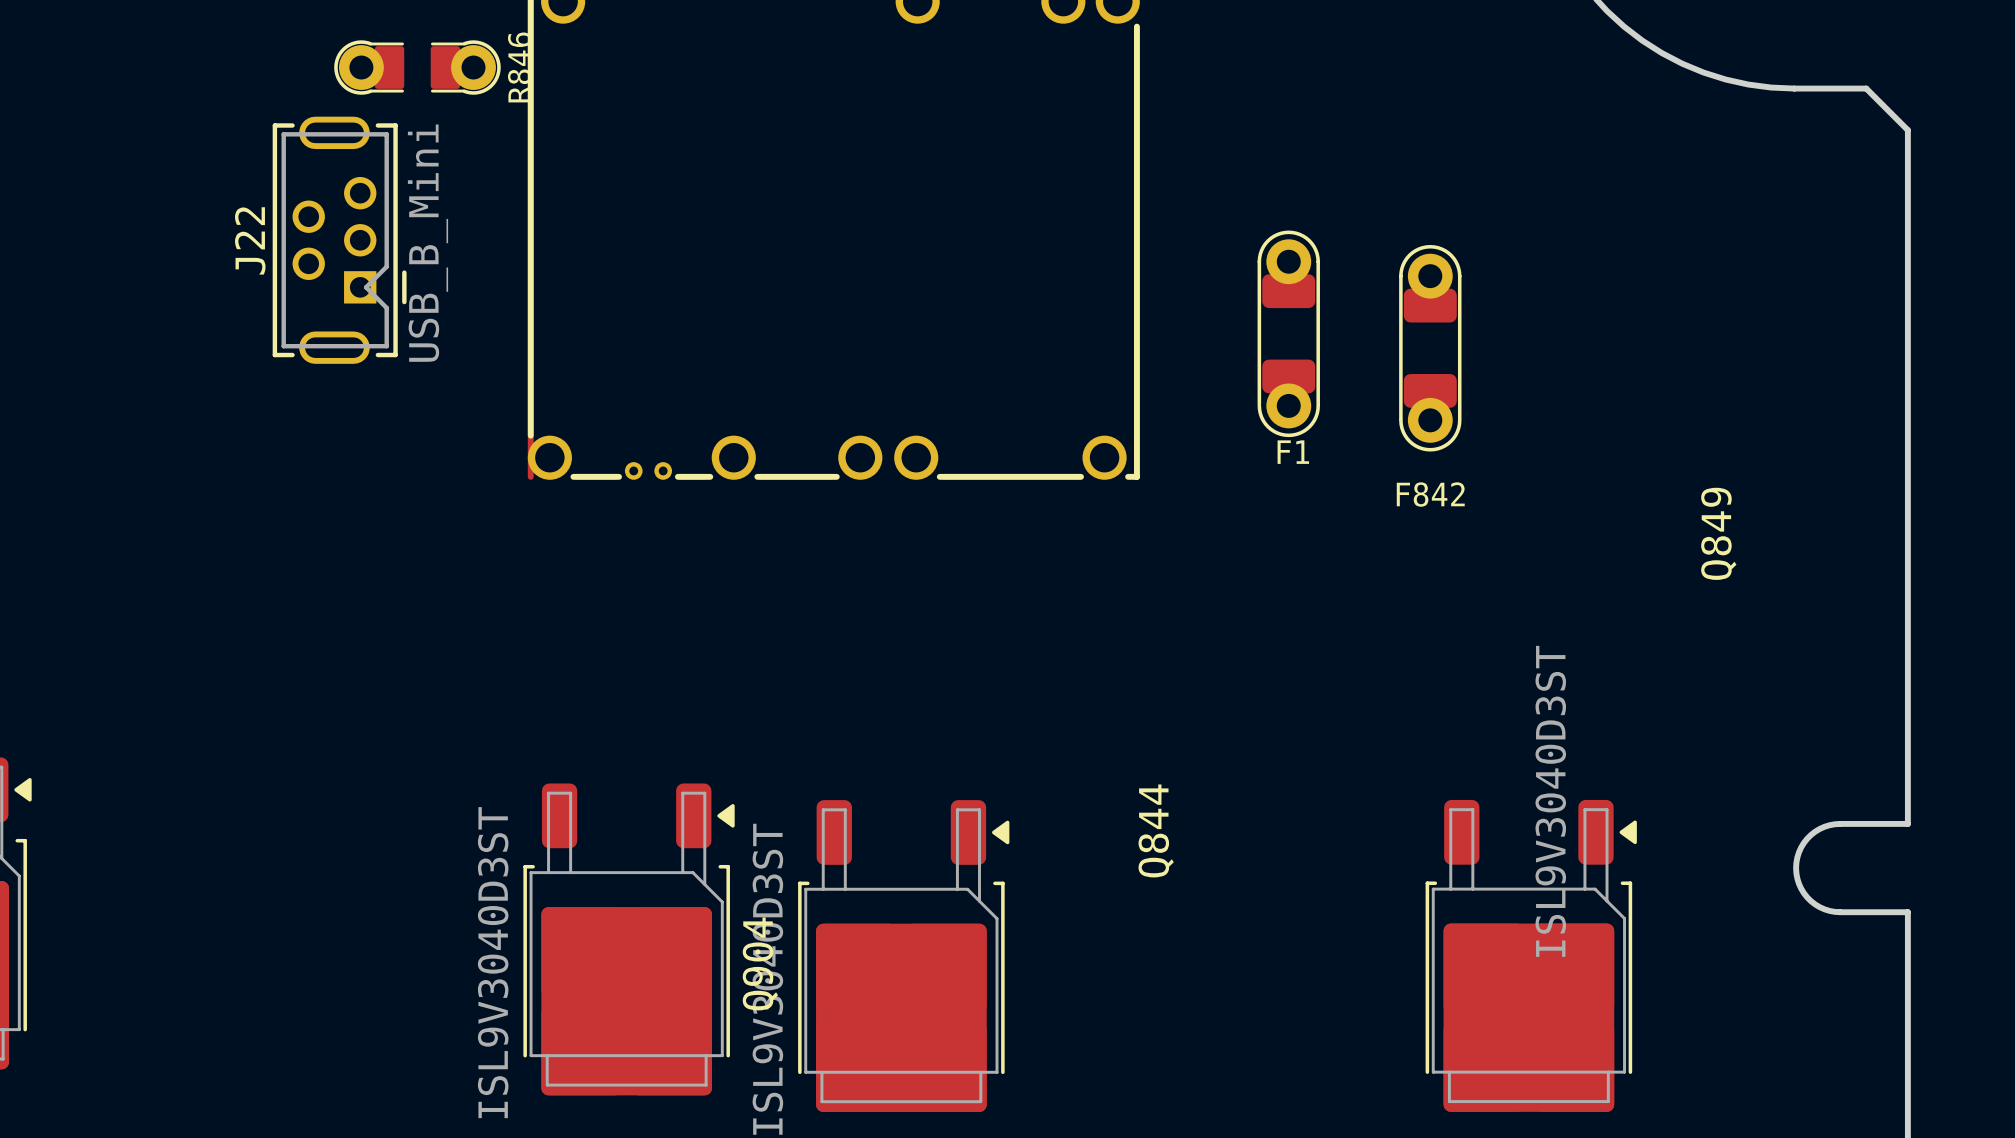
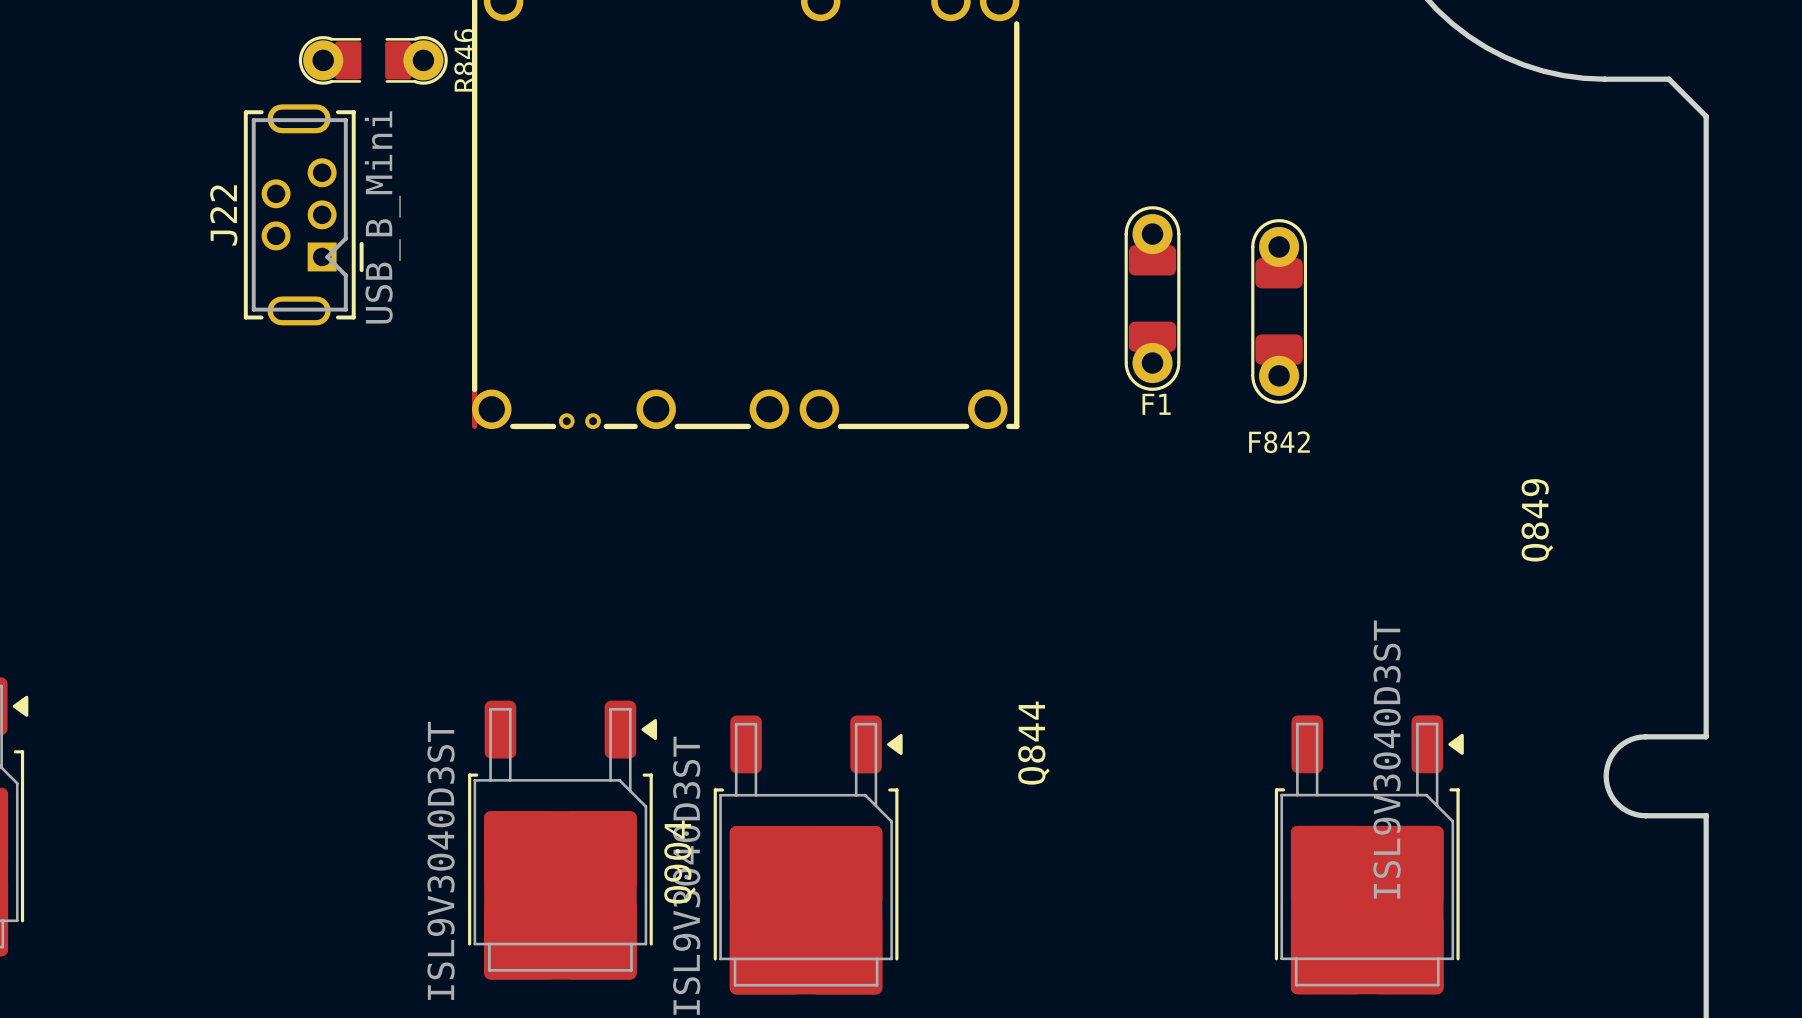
Q849 name position: Q849 (1718, 533) -> Q849 (1537, 520)
Q849 value position: ISL9V3040D3ST (1550, 801) -> ISL9V3040D3ST (1387, 759)

